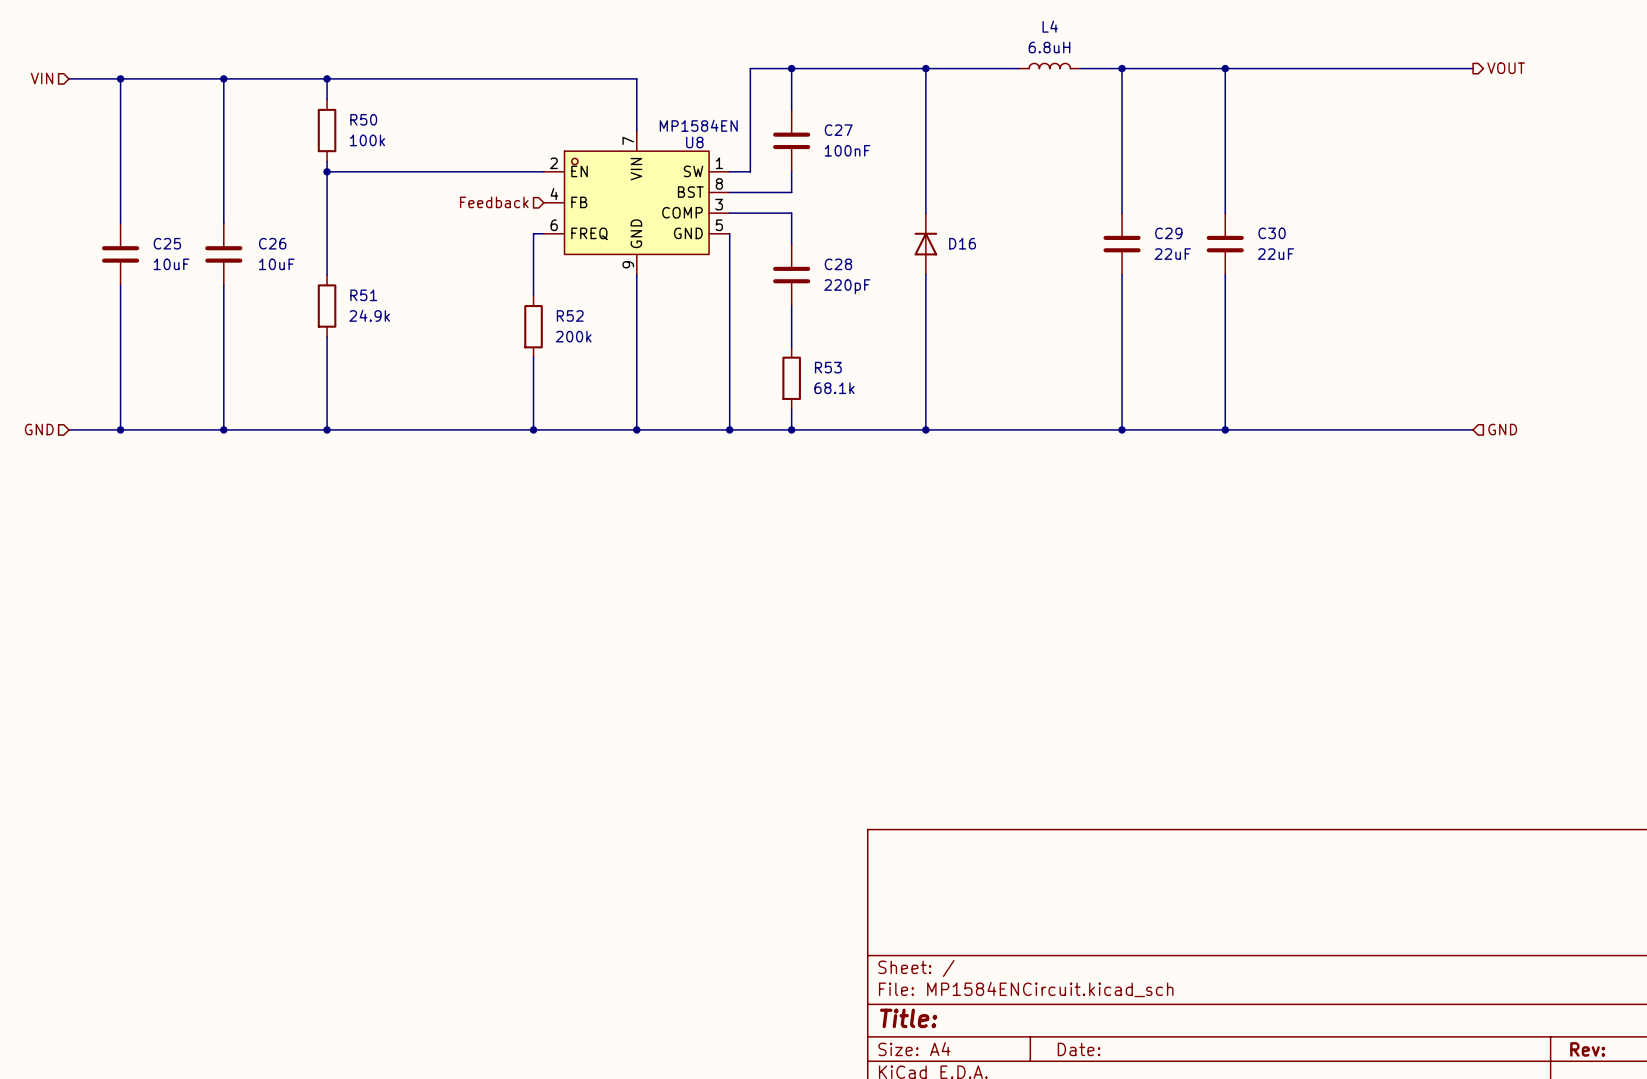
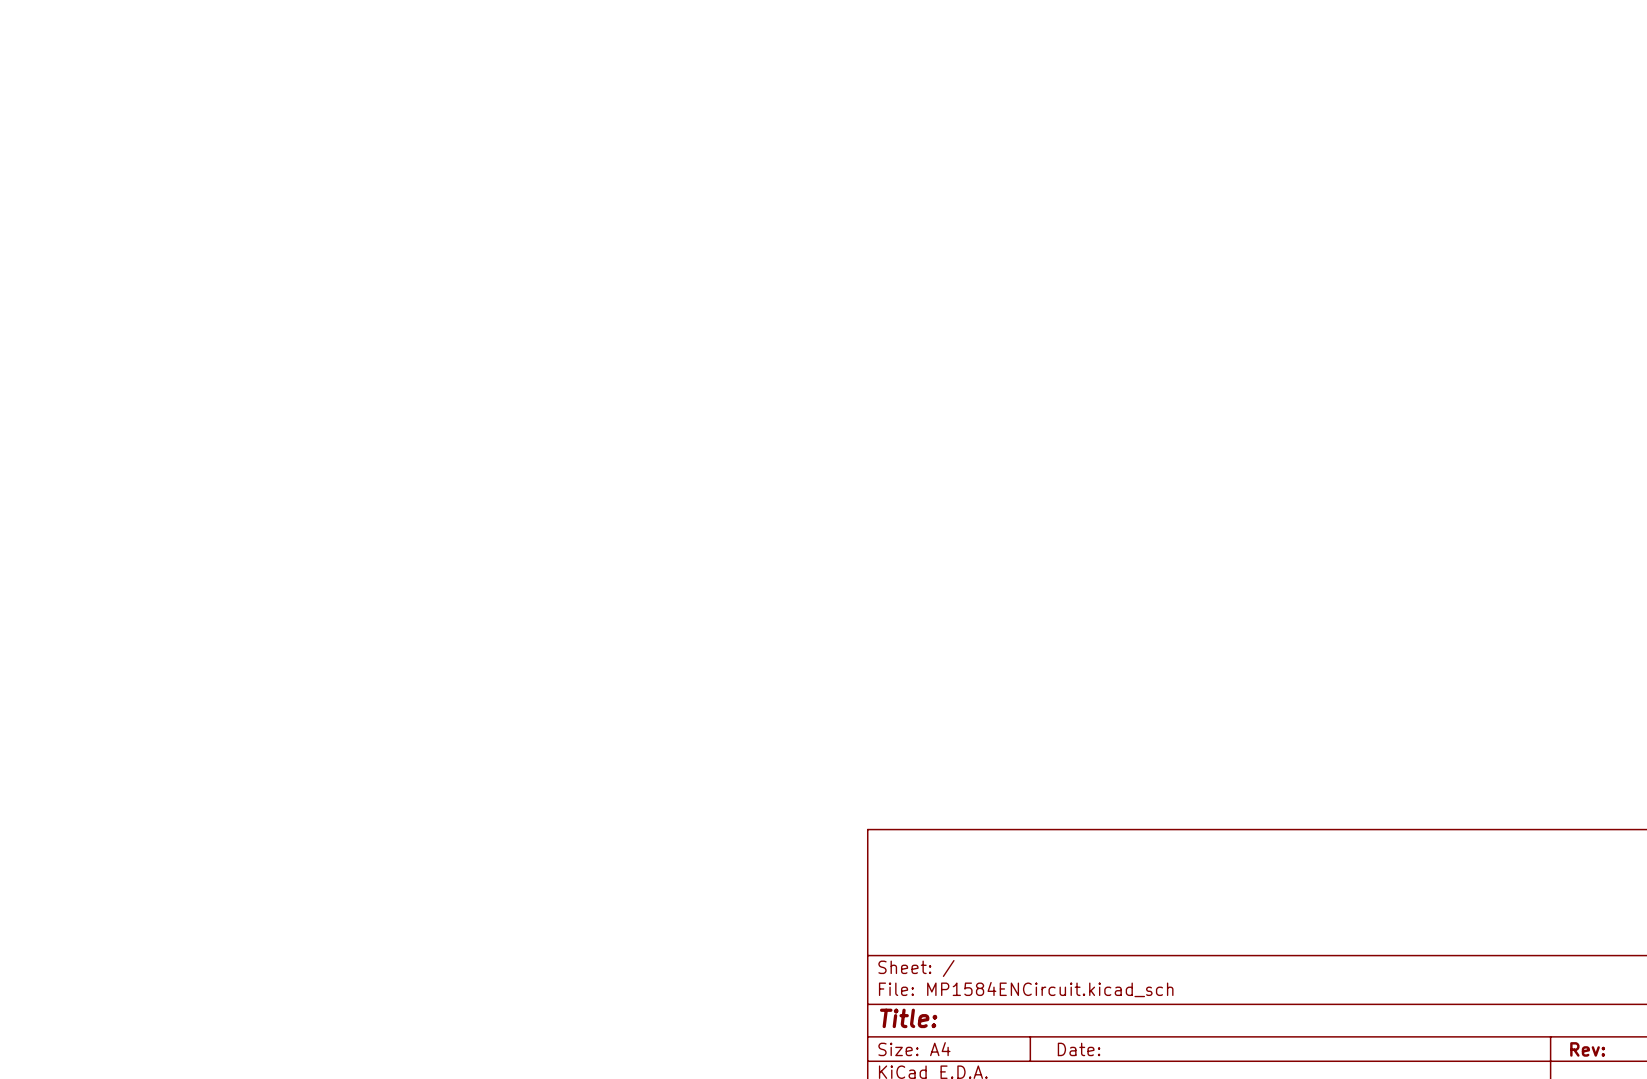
L4: 6.8uH (1049, 66) -> none
wire: (791, 68) (791, 109) -> none
junction: (791, 68) -> none
wire: (925, 68) (925, 213) -> none
junction: (925, 68) -> none
wire: (1018, 68) (750, 68) (750, 171) (729, 171) -> none
wire: (1080, 68) (1473, 68) -> none
wire: (1122, 68) (1122, 213) -> none
junction: (1122, 68) -> none
wire: (1225, 68) (1225, 213) -> none
junction: (1225, 68) -> none
hierarchical label: VOUT (1506, 68) -> none
hierarchical label: VIN (41, 78) -> none
wire: (68, 78) (636, 78) (636, 130) -> none
wire: (120, 78) (120, 223) -> none
junction: (120, 78) -> none
wire: (223, 78) (223, 223) -> none
junction: (223, 78) -> none
wire: (327, 78) (327, 99) -> none
junction: (327, 78) -> none
R50: 100k (327, 130) -> none
C27: 100nF (791, 140) -> none
wire: (327, 161) (327, 275) -> none
wire: (327, 171) (543, 171) -> none
junction: (327, 171) -> none
wire: (791, 171) (791, 192) (729, 192) -> none
hierarchical label: Feedback (494, 202) -> none
U8: MP1584EN (636, 202) -> none
wire: (729, 213) (791, 213) (791, 244) -> none
wire: (543, 233) (533, 233) (533, 295) -> none
wire: (729, 233) (729, 429) -> none
D16: (925, 244) -> none
C29: 22uF (1122, 244) -> none
C30: 22uF (1225, 244) -> none
C25: 10uF (120, 254) -> none
C26: 10uF (223, 254) -> none
wire: (636, 275) (636, 429) -> none
C28: 220pF (791, 275) -> none
wire: (925, 275) (925, 429) -> none
wire: (1122, 275) (1122, 429) -> none
wire: (1225, 275) (1225, 429) -> none
wire: (120, 285) (120, 429) -> none
wire: (223, 285) (223, 429) -> none
R51: 24.9k (327, 306) -> none
wire: (791, 306) (791, 347) -> none
R52: 200k (533, 326) -> none
wire: (327, 337) (327, 429) -> none
wire: (533, 357) (533, 429) -> none
R53: 68.1k (791, 378) -> none
wire: (791, 409) (791, 429) -> none
hierarchical label: GND (39, 429) -> none
wire: (68, 429) (1473, 429) -> none
junction: (120, 429) -> none
junction: (223, 429) -> none
junction: (327, 429) -> none
junction: (533, 429) -> none
junction: (636, 429) -> none
junction: (729, 429) -> none
junction: (791, 429) -> none
junction: (925, 429) -> none
junction: (1122, 429) -> none
junction: (1225, 429) -> none
hierarchical label: GND (1502, 429) -> none

